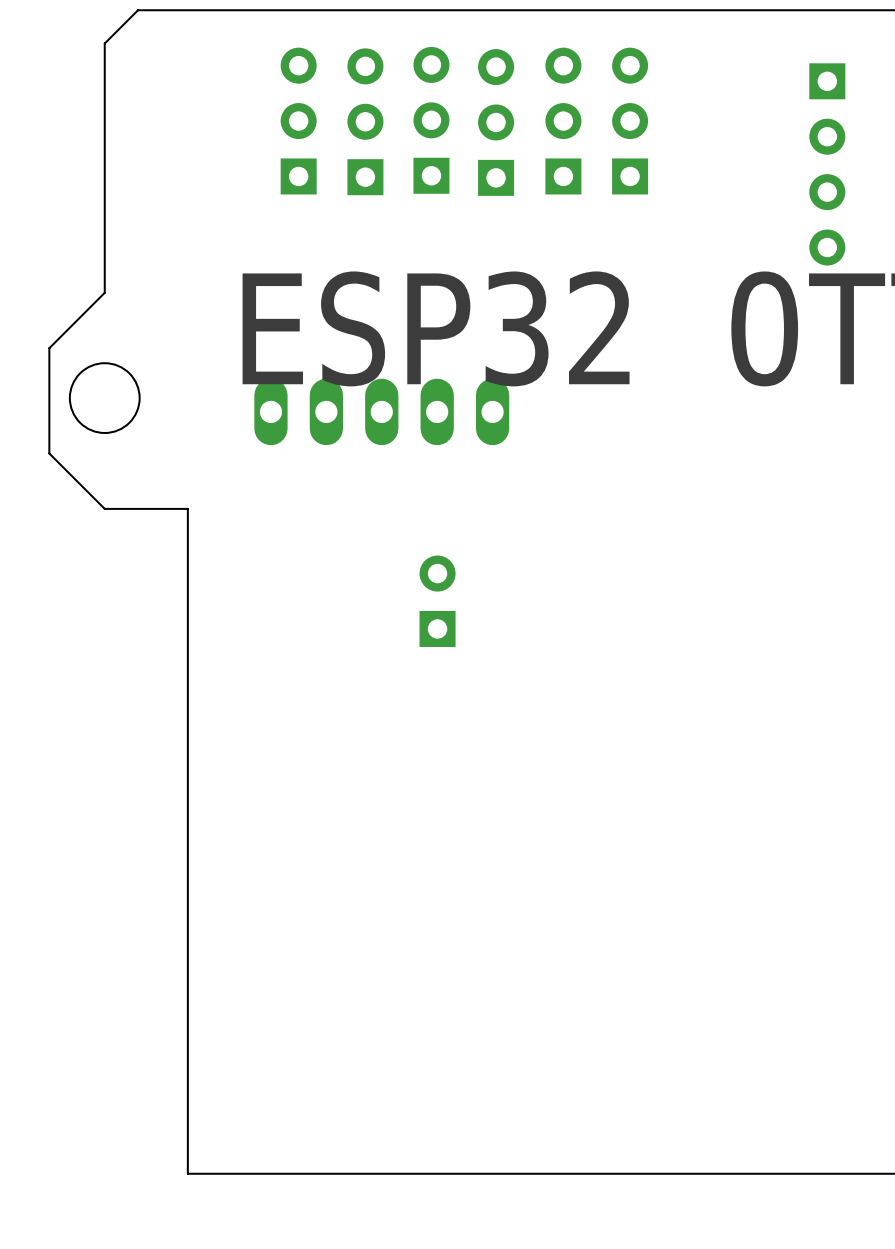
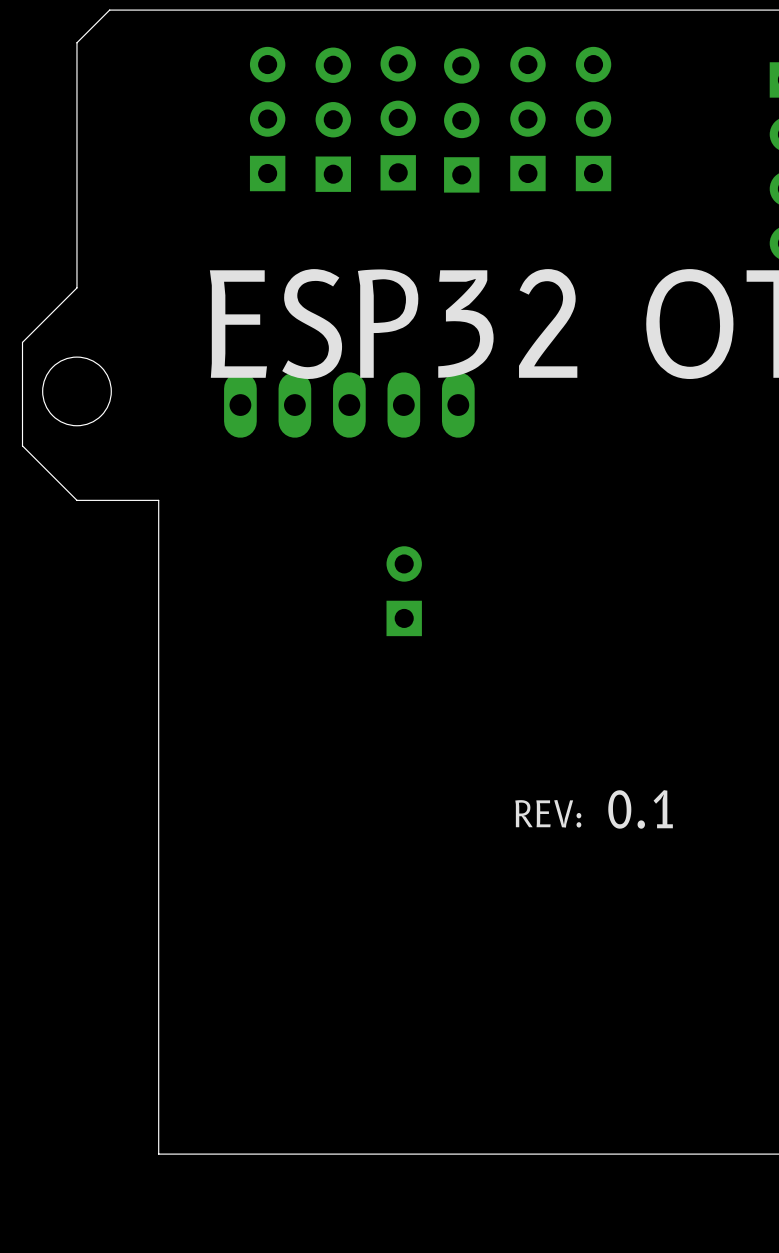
drawing: none -> [515, 790, 673, 829]

